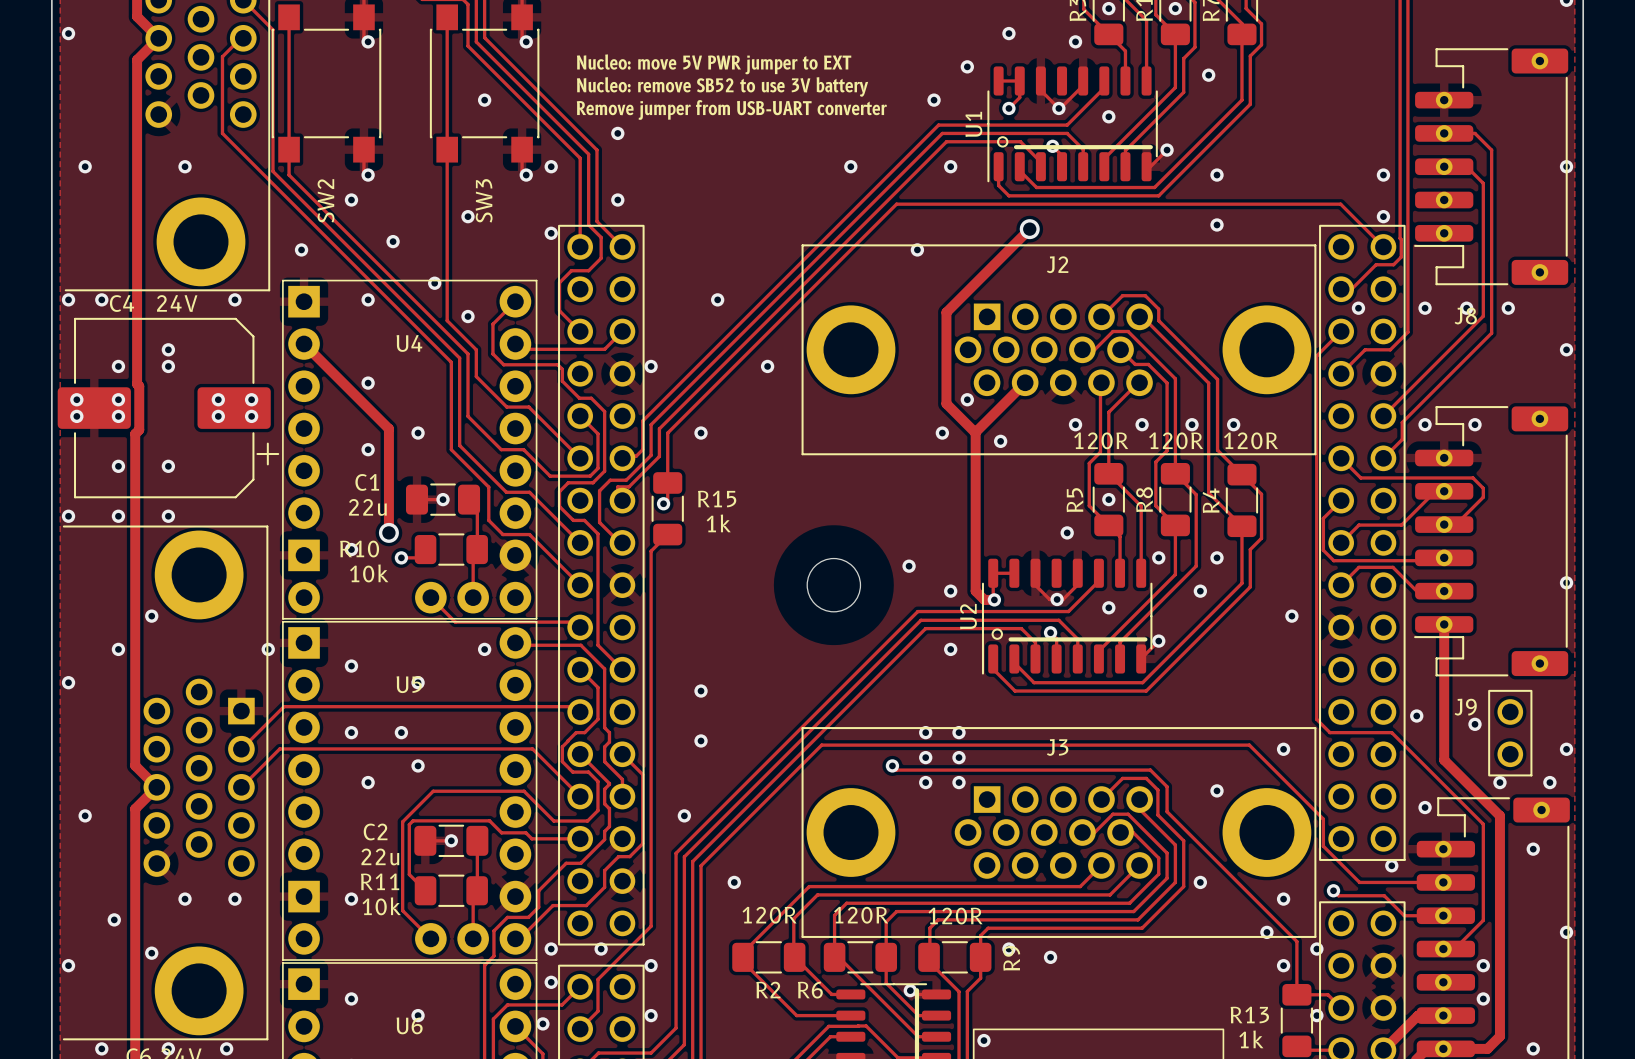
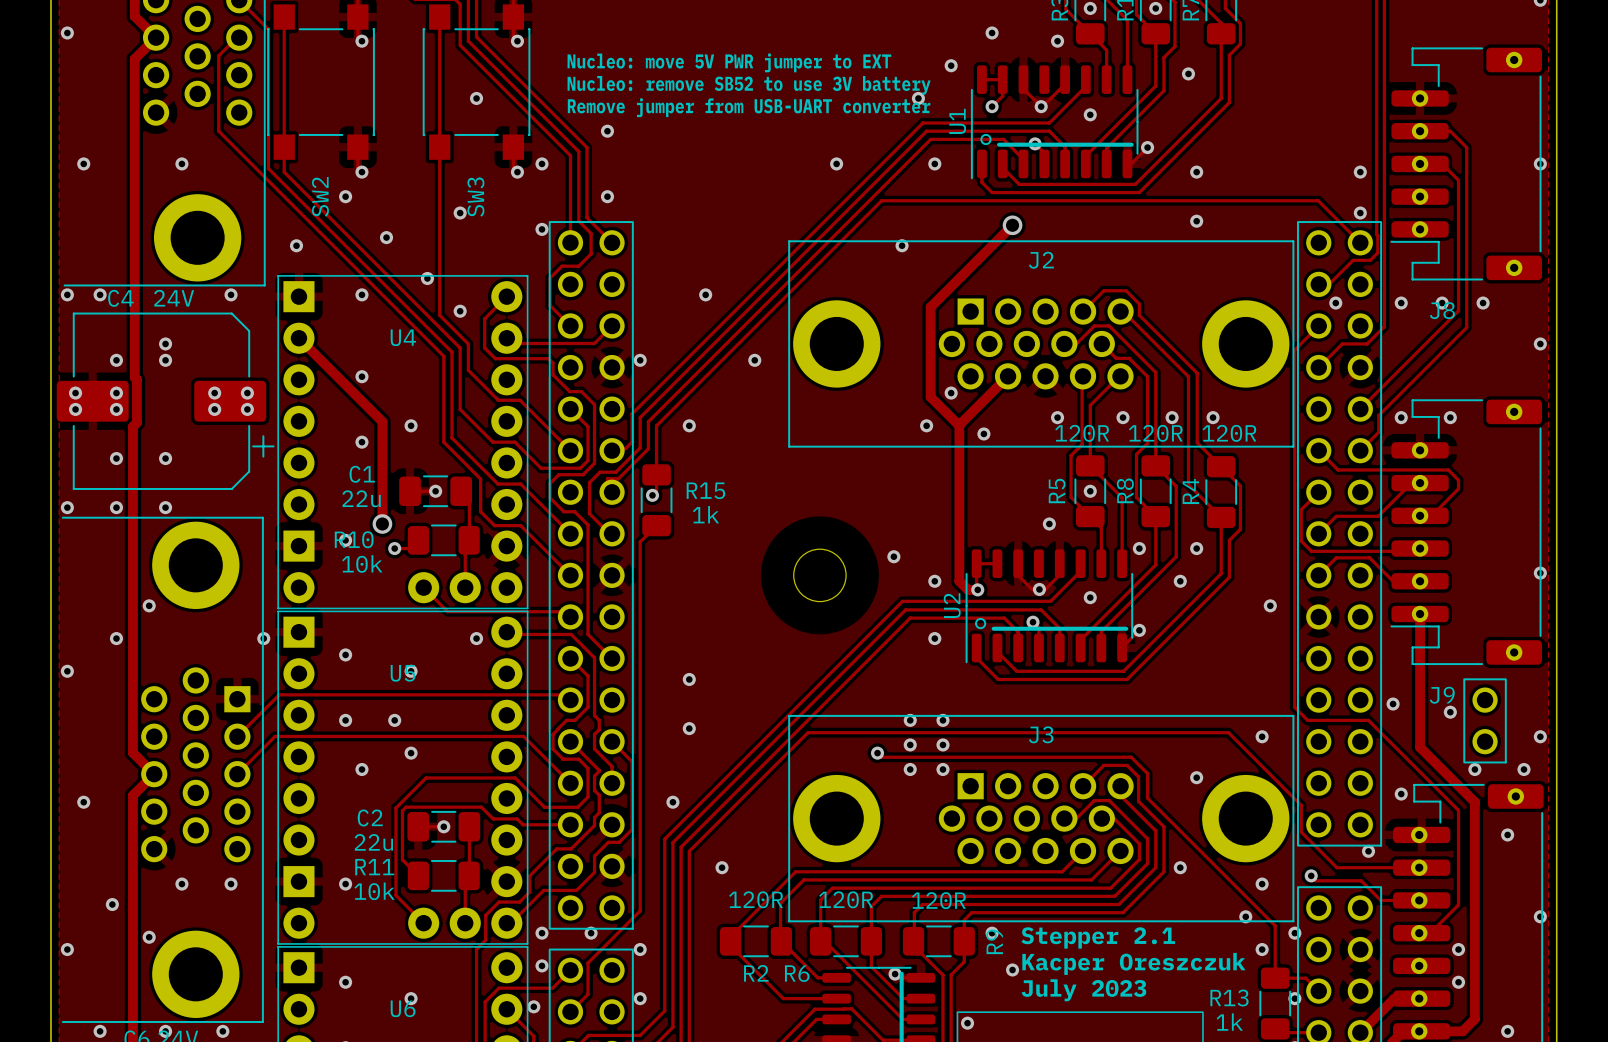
text: none -> Stepper 2.1 (1098, 937)
via position: (1050, 957) -> (1012, 969)
text: none -> Kacper Oreszczuk (1133, 963)
text: none -> July 2023 (1083, 990)

